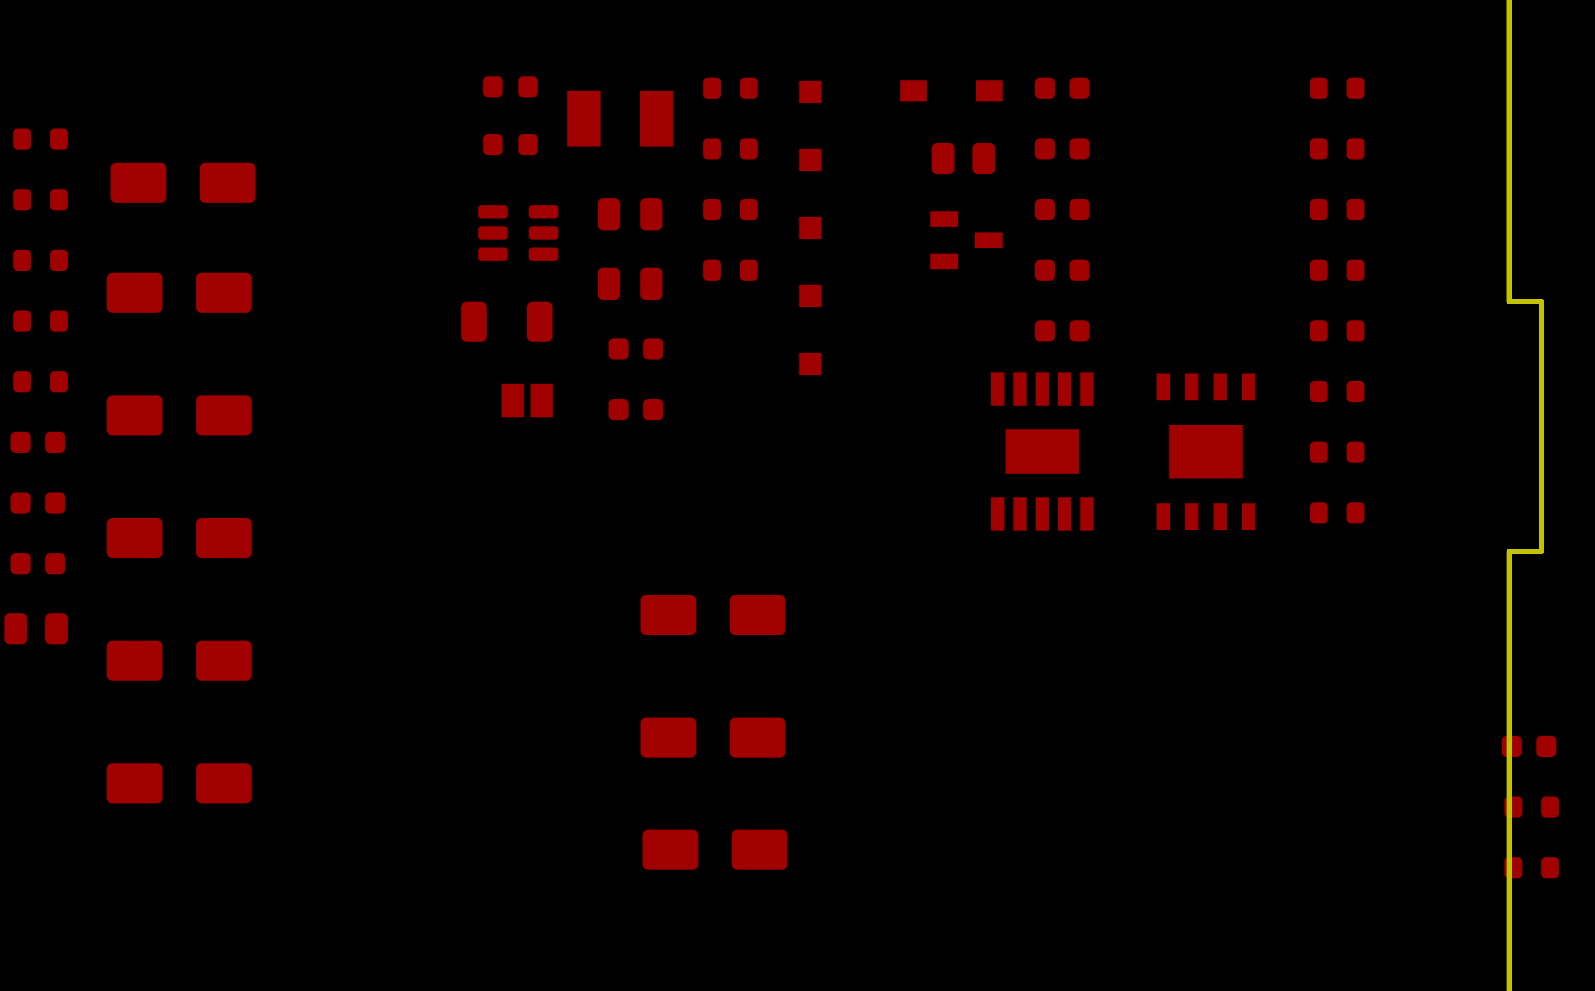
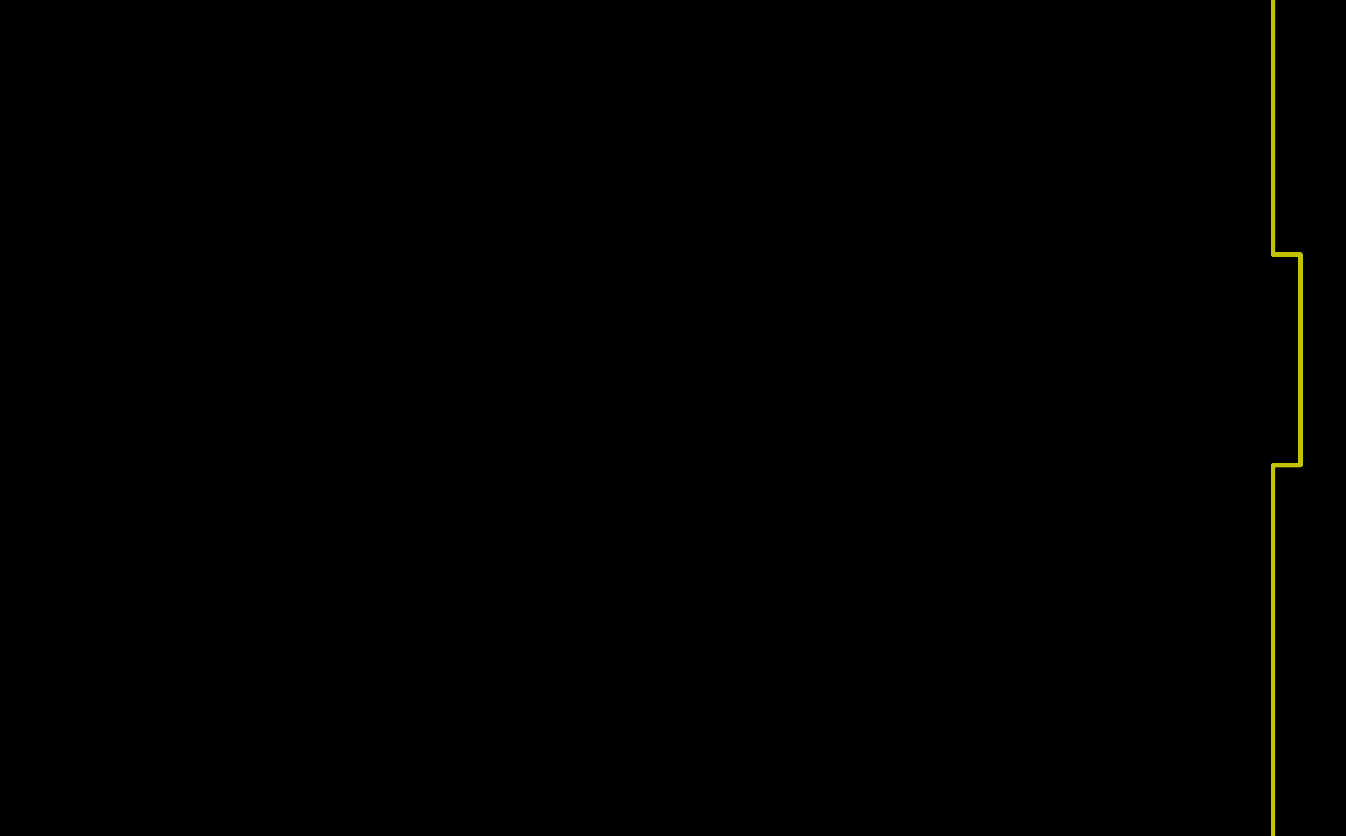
part: (510, 86) -> none
part: (730, 88) -> none
part: (1062, 88) -> none
part: (1337, 88) -> none
part: (951, 90) -> none
part: (810, 91) -> none
part: (620, 118) -> none
part: (40, 139) -> none
part: (510, 144) -> none
part: (730, 148) -> none
part: (1062, 148) -> none
part: (1337, 148) -> none
part: (963, 158) -> none
part: (810, 159) -> none
part: (183, 182) -> none
part: (40, 199) -> none
part: (730, 209) -> none
part: (1062, 209) -> none
part: (1337, 209) -> none
part: (630, 214) -> none
part: (810, 227) -> none
part: (518, 232) -> none
part: (966, 240) -> none
part: (40, 260) -> none
part: (730, 270) -> none
part: (1062, 270) -> none
part: (1337, 270) -> none
part: (630, 283) -> none
part: (179, 292) -> none
part: (810, 295) -> none
part: (40, 321) -> none
part: (506, 321) -> none
part: (1062, 330) -> none
part: (1337, 330) -> none
part: (635, 348) -> none
part: (810, 363) -> none
part: (40, 381) -> none
part: (1337, 391) -> none
part: (527, 400) -> none
part: (635, 409) -> none
part: (179, 415) -> none
part: (37, 442) -> none
part: (1042, 451) -> none
part: (1206, 451) -> none
part: (1337, 452) -> none
part: (37, 503) -> none
part: (1337, 512) -> none
part: (179, 538) -> none
part: (37, 563) -> none
part: (713, 614) -> none
part: (36, 628) -> none
part: (179, 660) -> none
part: (713, 737) -> none
part: (1529, 746) -> none
part: (179, 783) -> none
part: (1531, 807) -> none
part: (715, 849) -> none
part: (1531, 867) -> none

